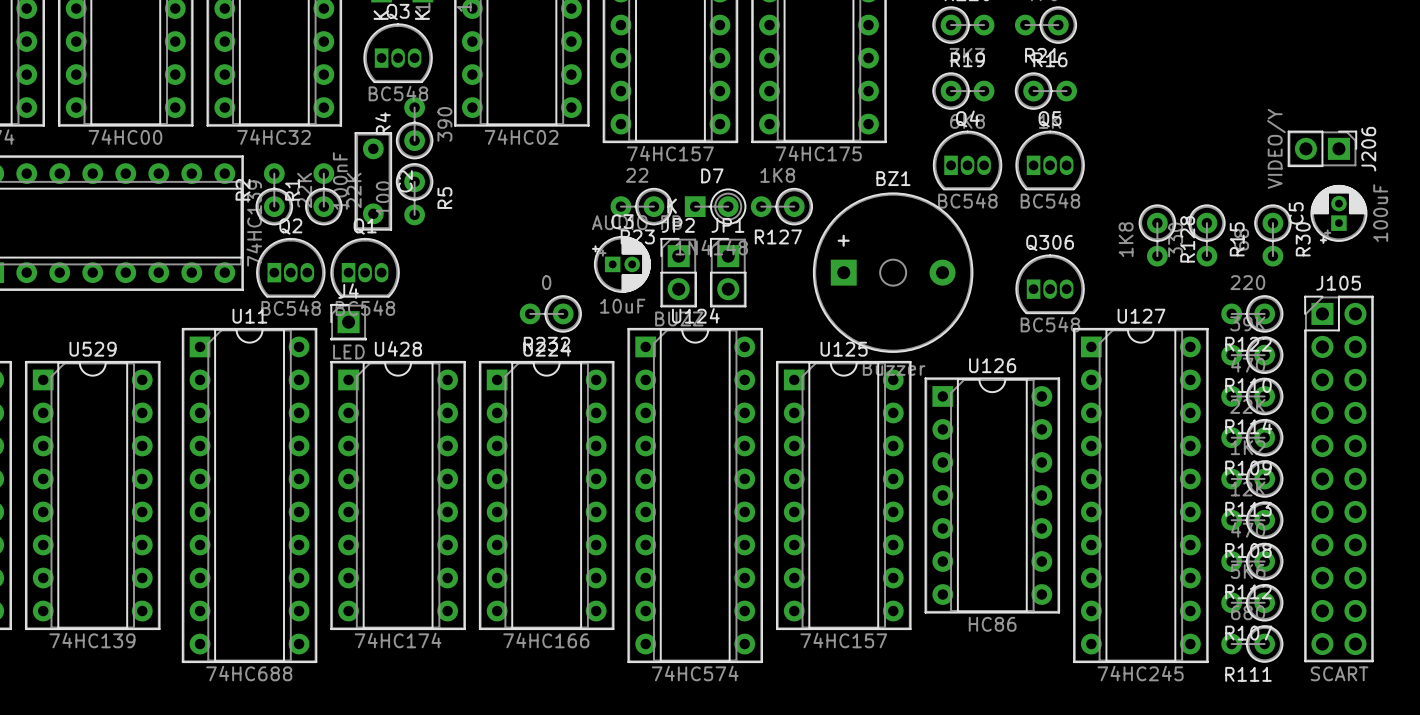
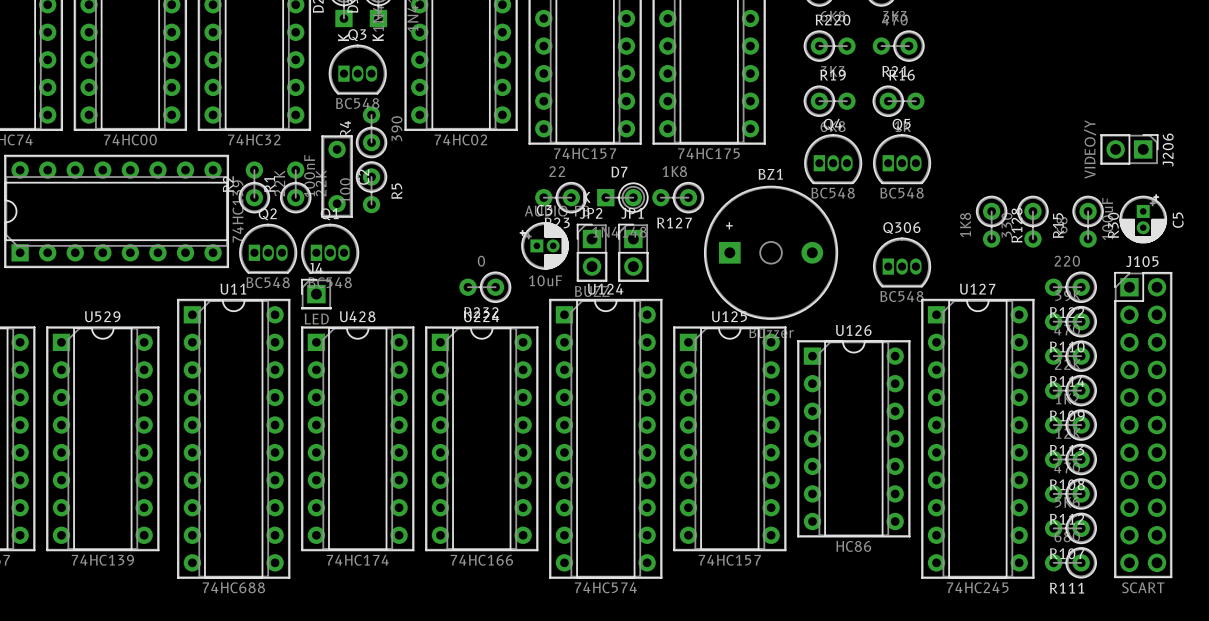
C5 rotation: 0° (1338, 214) -> 180° (1143, 218)

